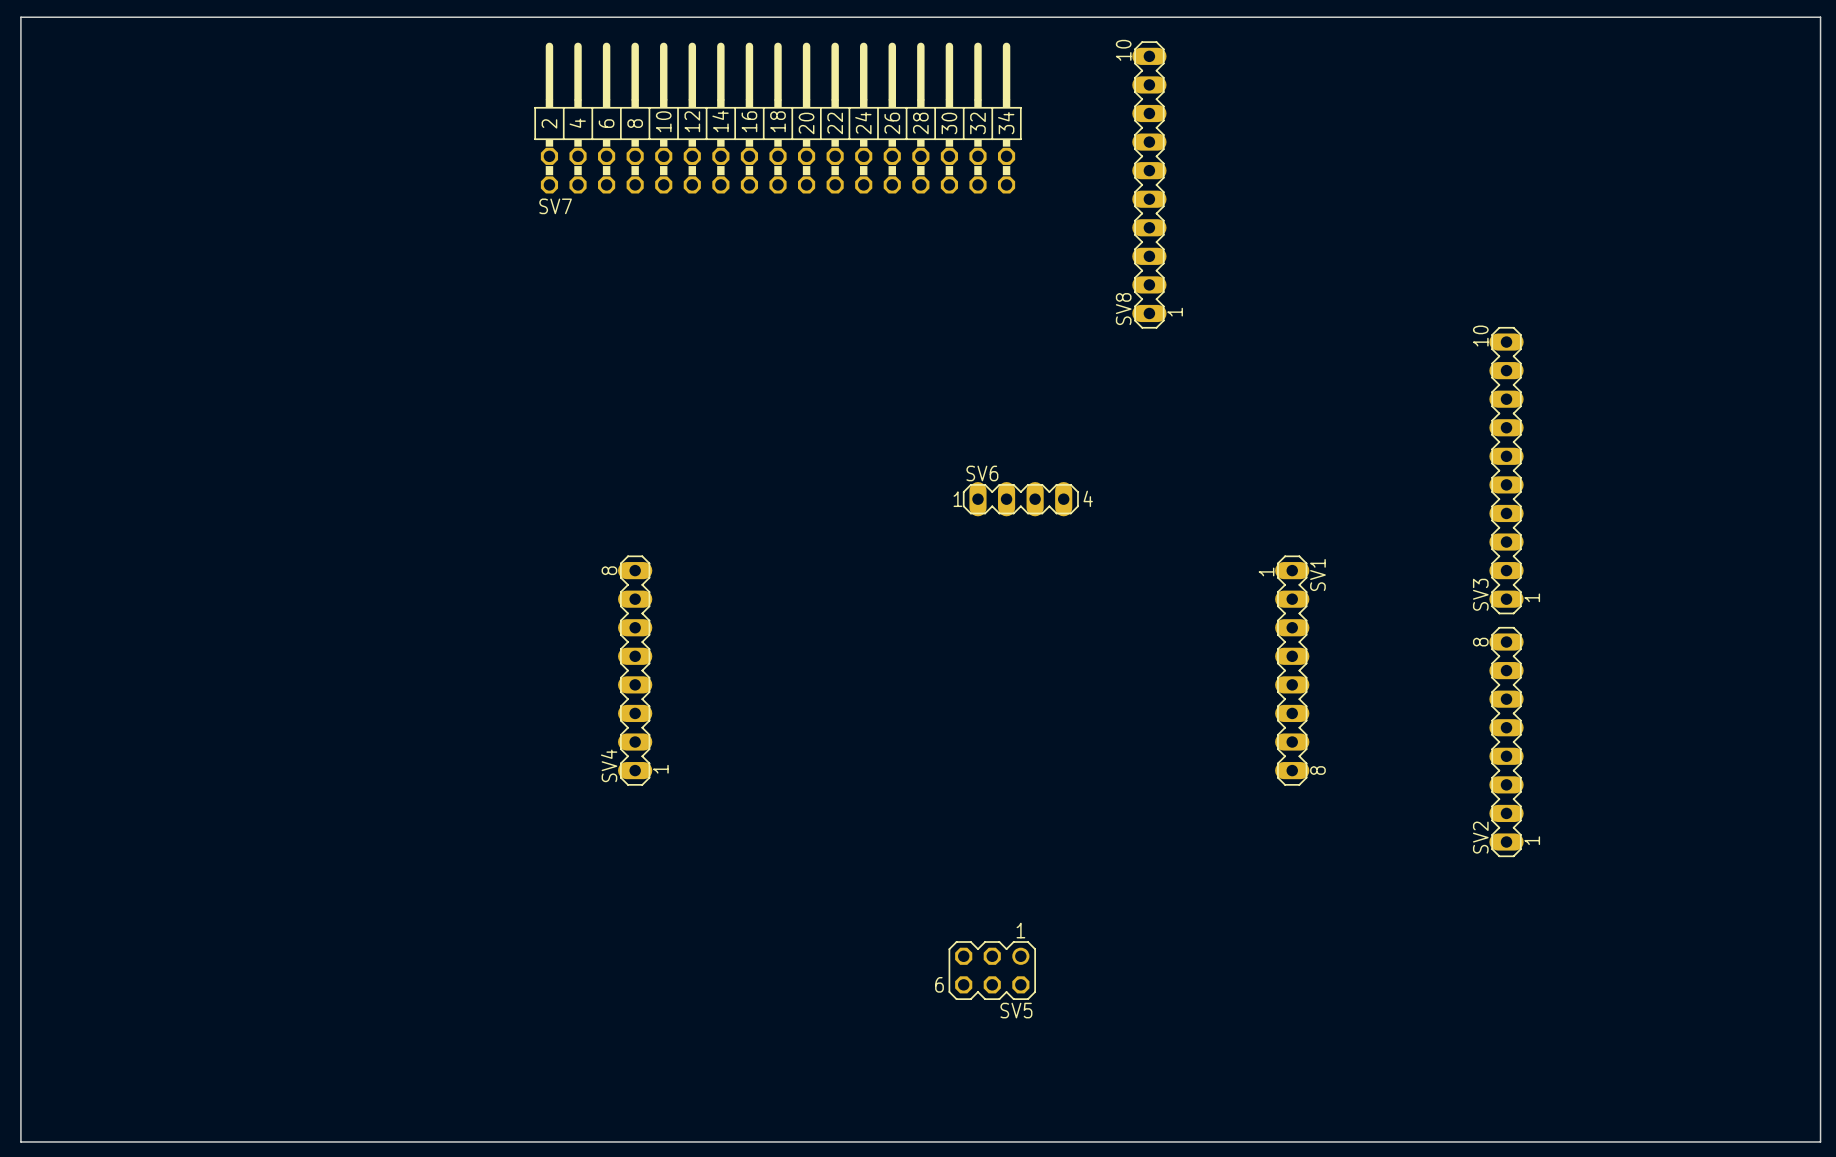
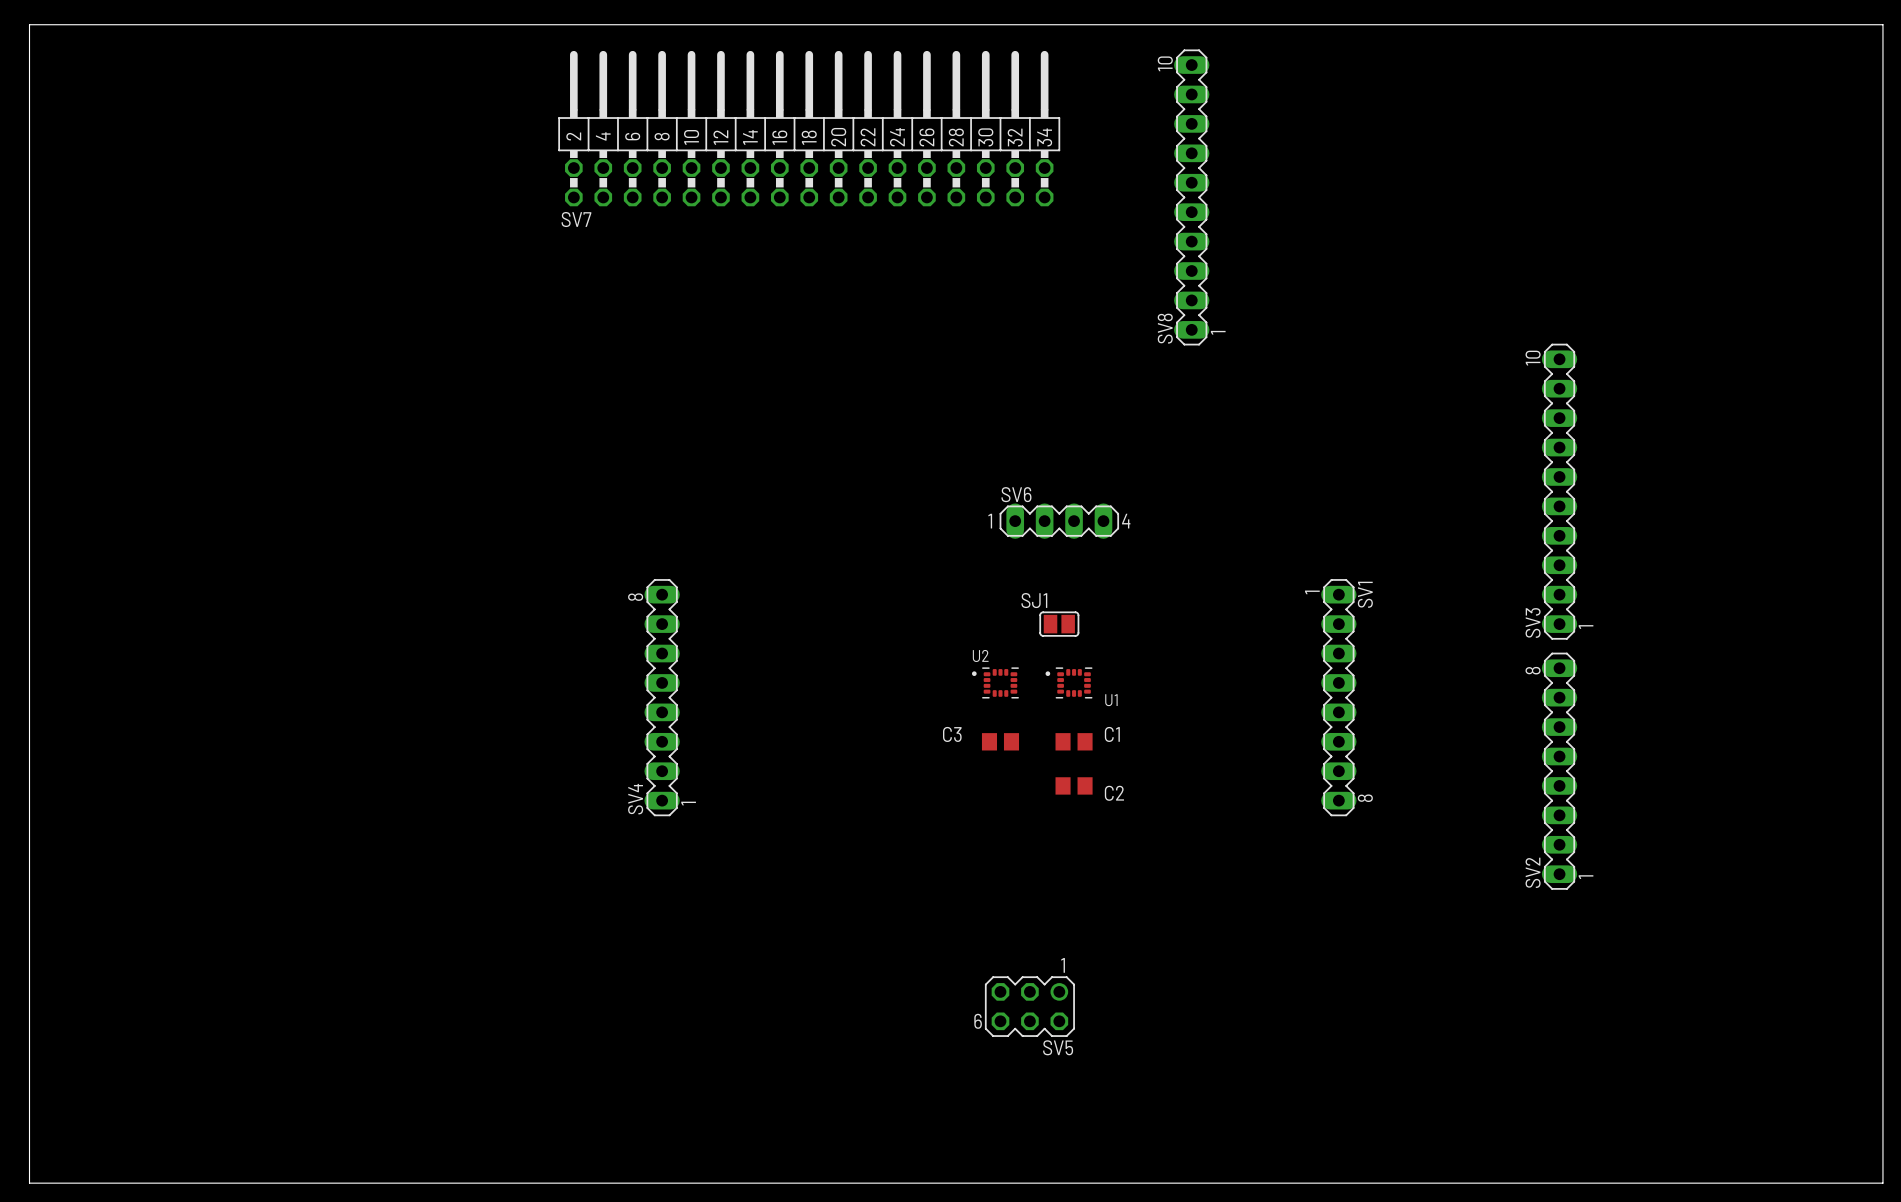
SJ1: none -> (1059, 624)
U2: none -> (995, 682)
U1: none -> (1069, 682)
C3: none -> (1000, 741)
C1: none -> (1074, 741)
C2: none -> (1074, 785)

